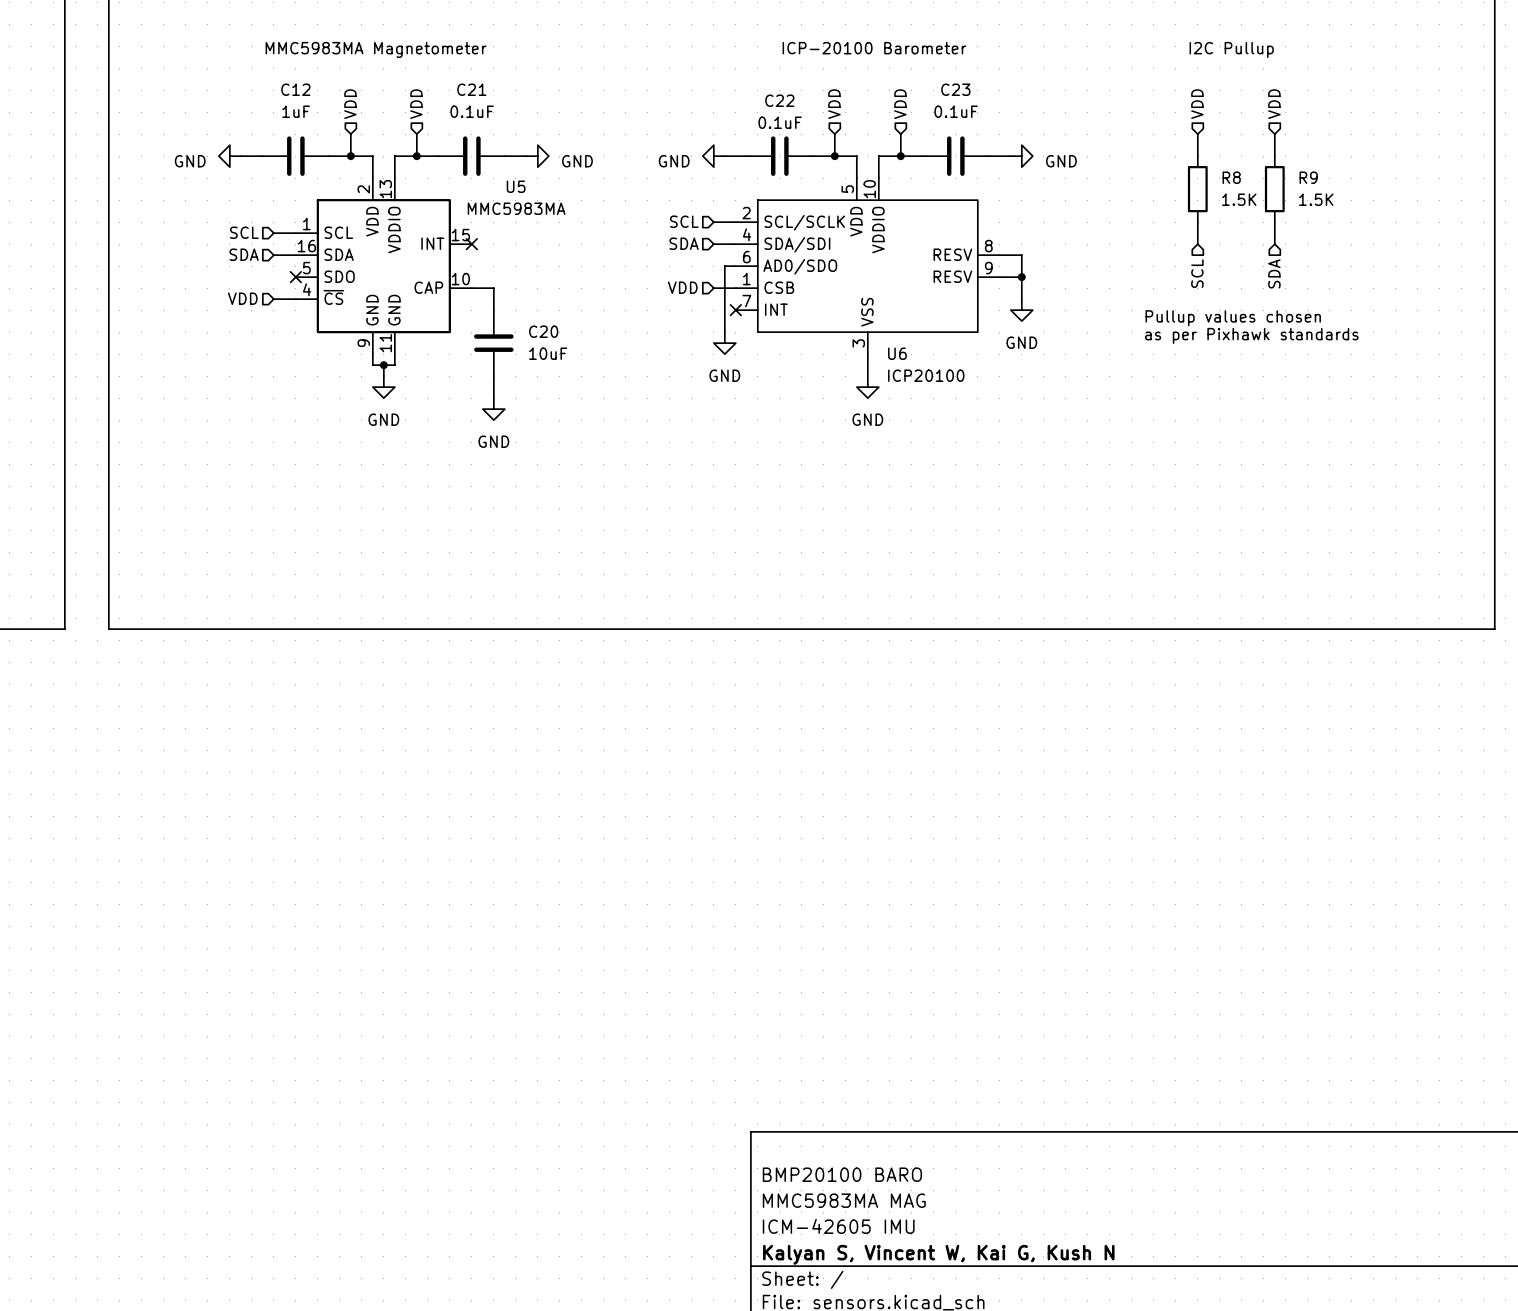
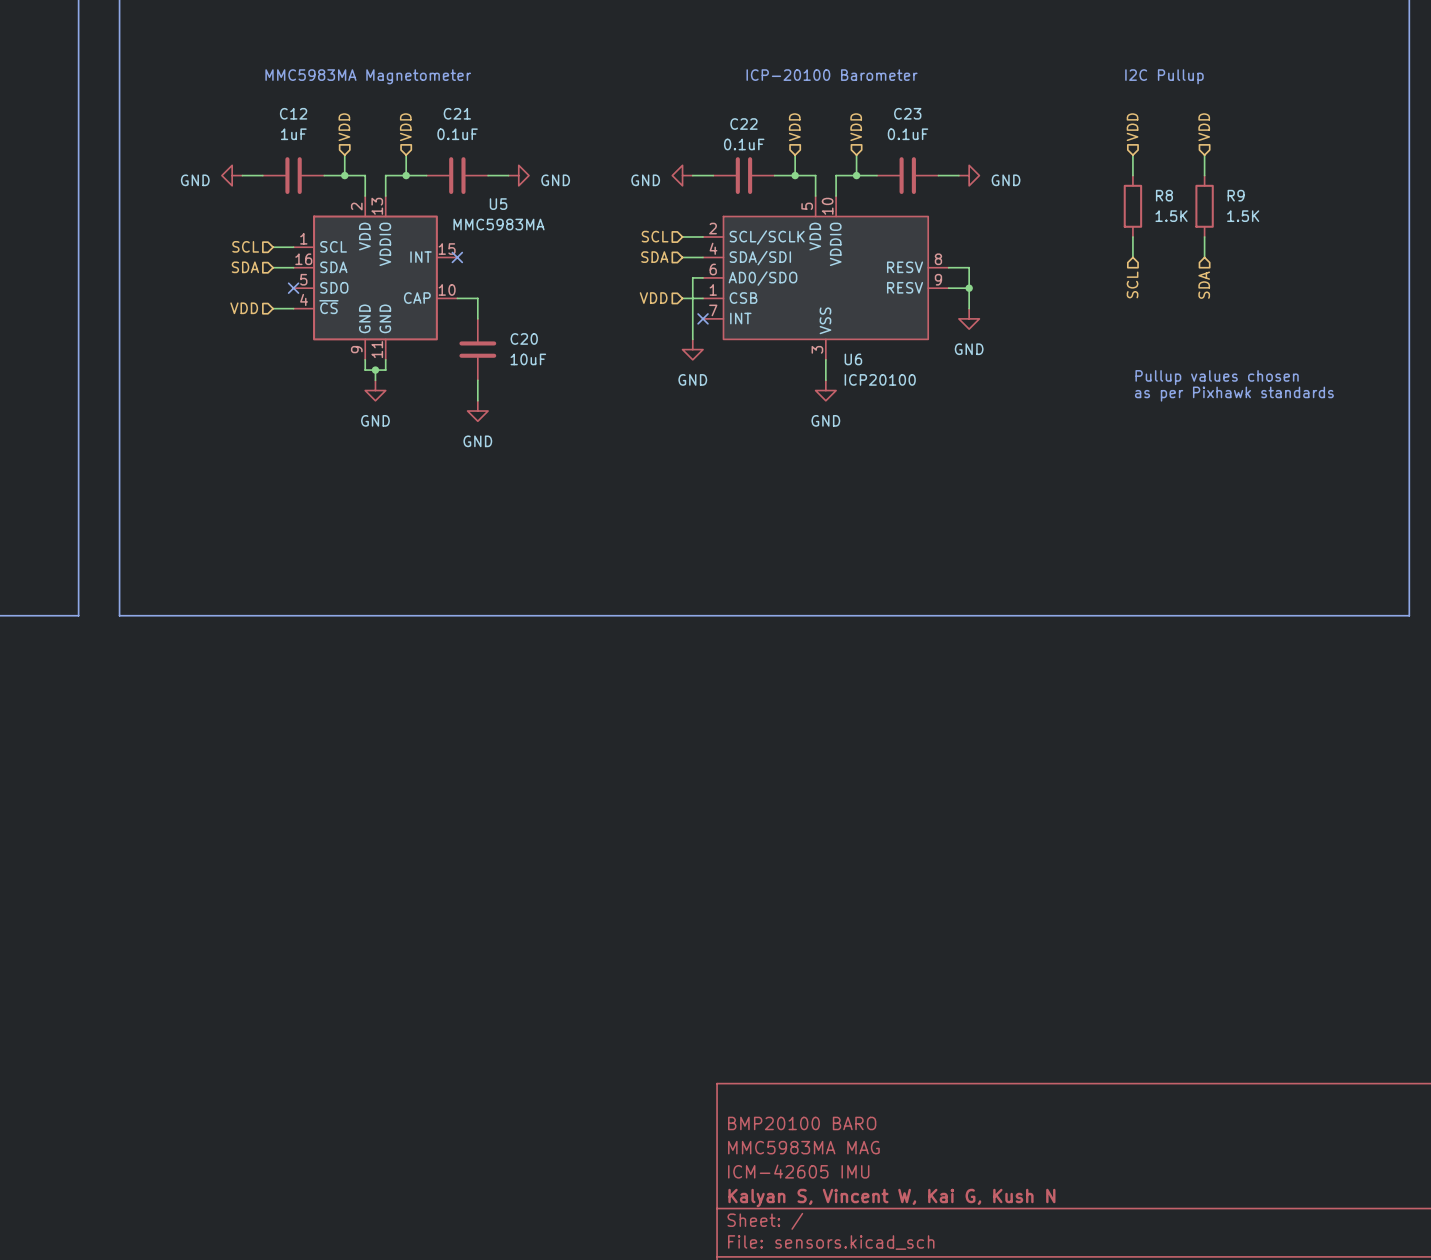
text position: Pullup values chosen (1233, 318) -> Pullup values chosen (1217, 377)
text position: as per Pixhawk standards (1251, 335) -> as per Pixhawk standards (1234, 394)

